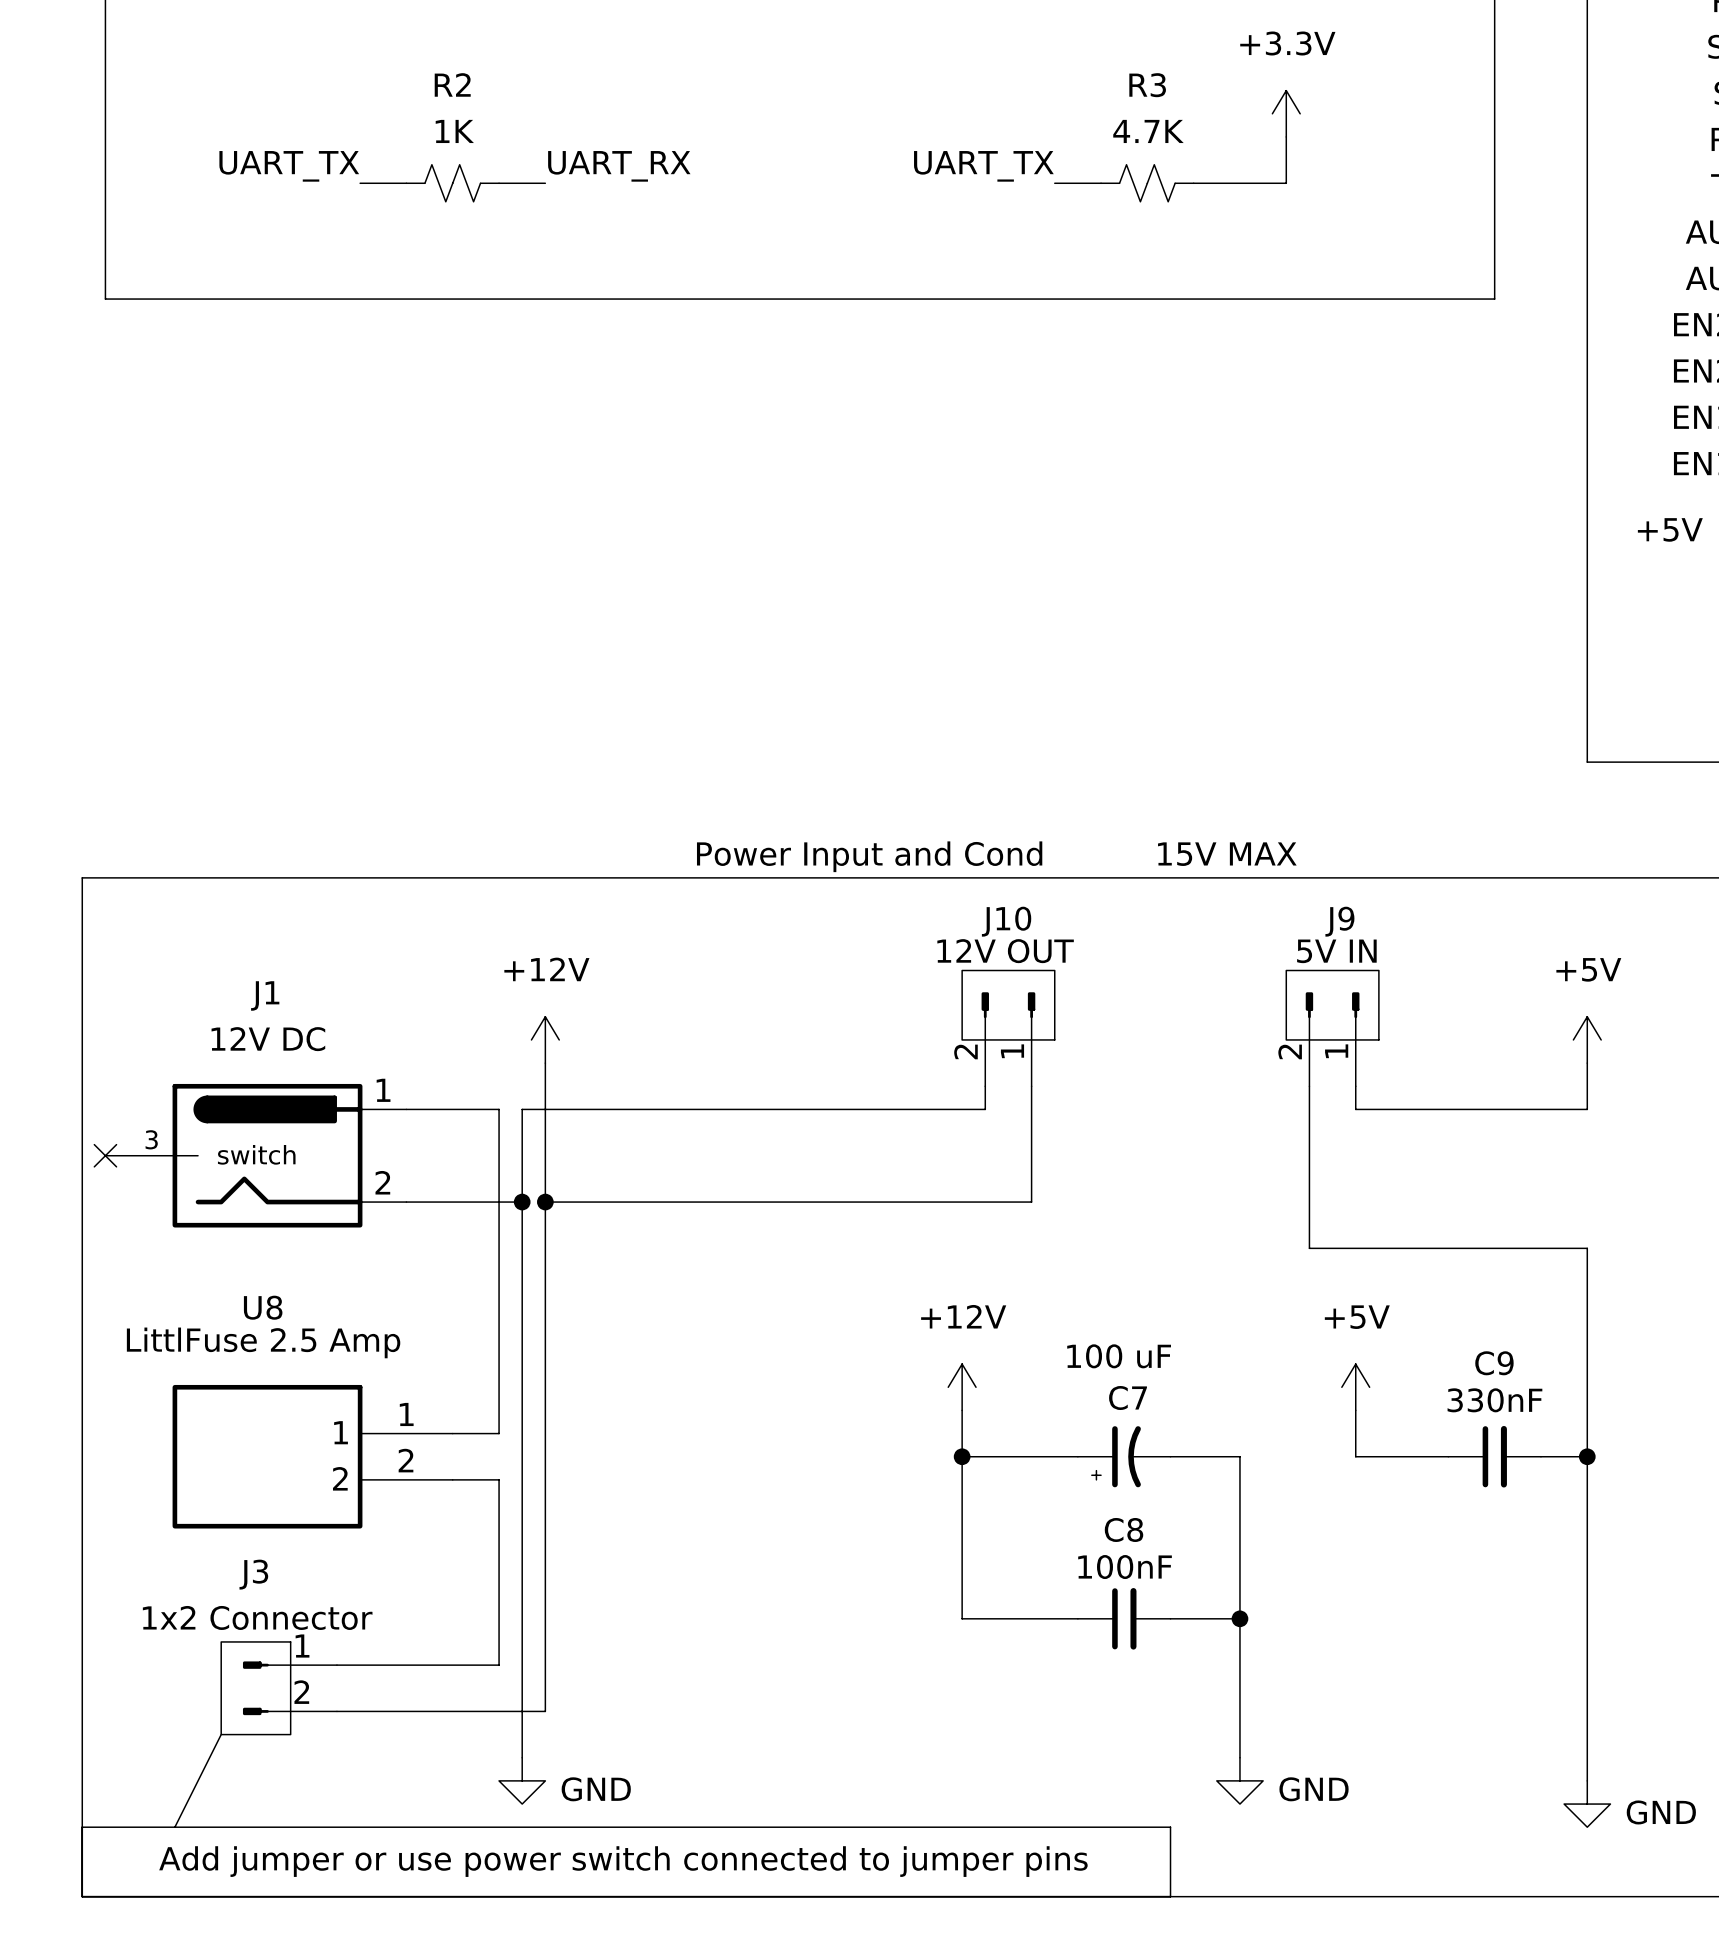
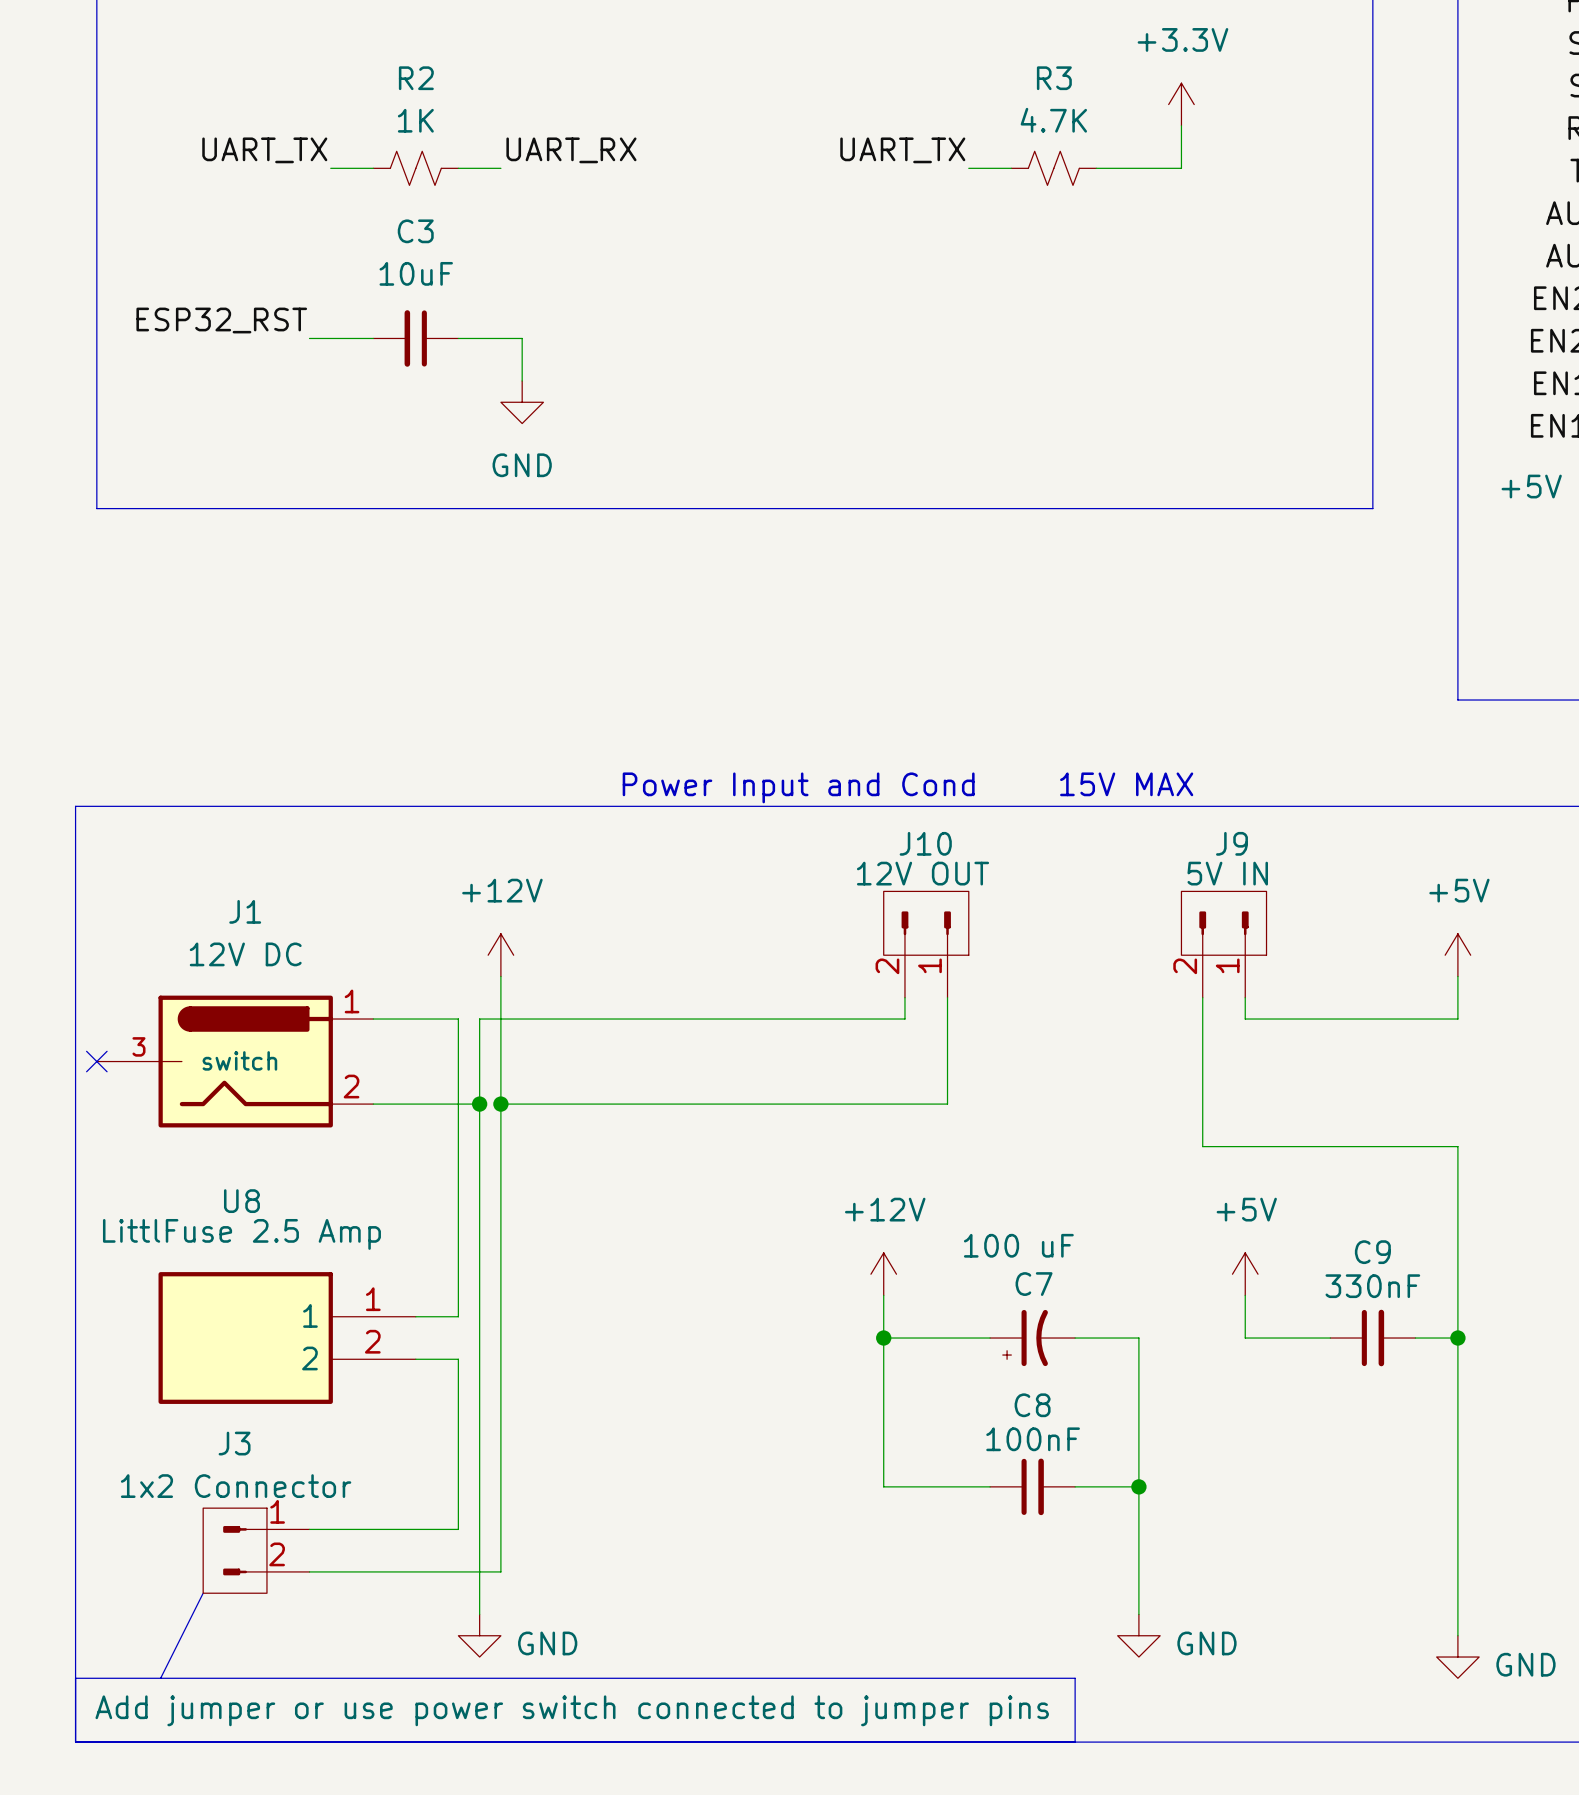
line: (105, 299) (1494, 299) -> (96, 274) (96, 508) (1372, 508) (1372, 274)
label: none -> ESP32_RST (221, 320)
wire: none -> (309, 338) (373, 338)
C3: none -> 10uF (415, 338)
wire: none -> (458, 338) (522, 338) (522, 381)
power symbol: none -> GND (522, 402)

